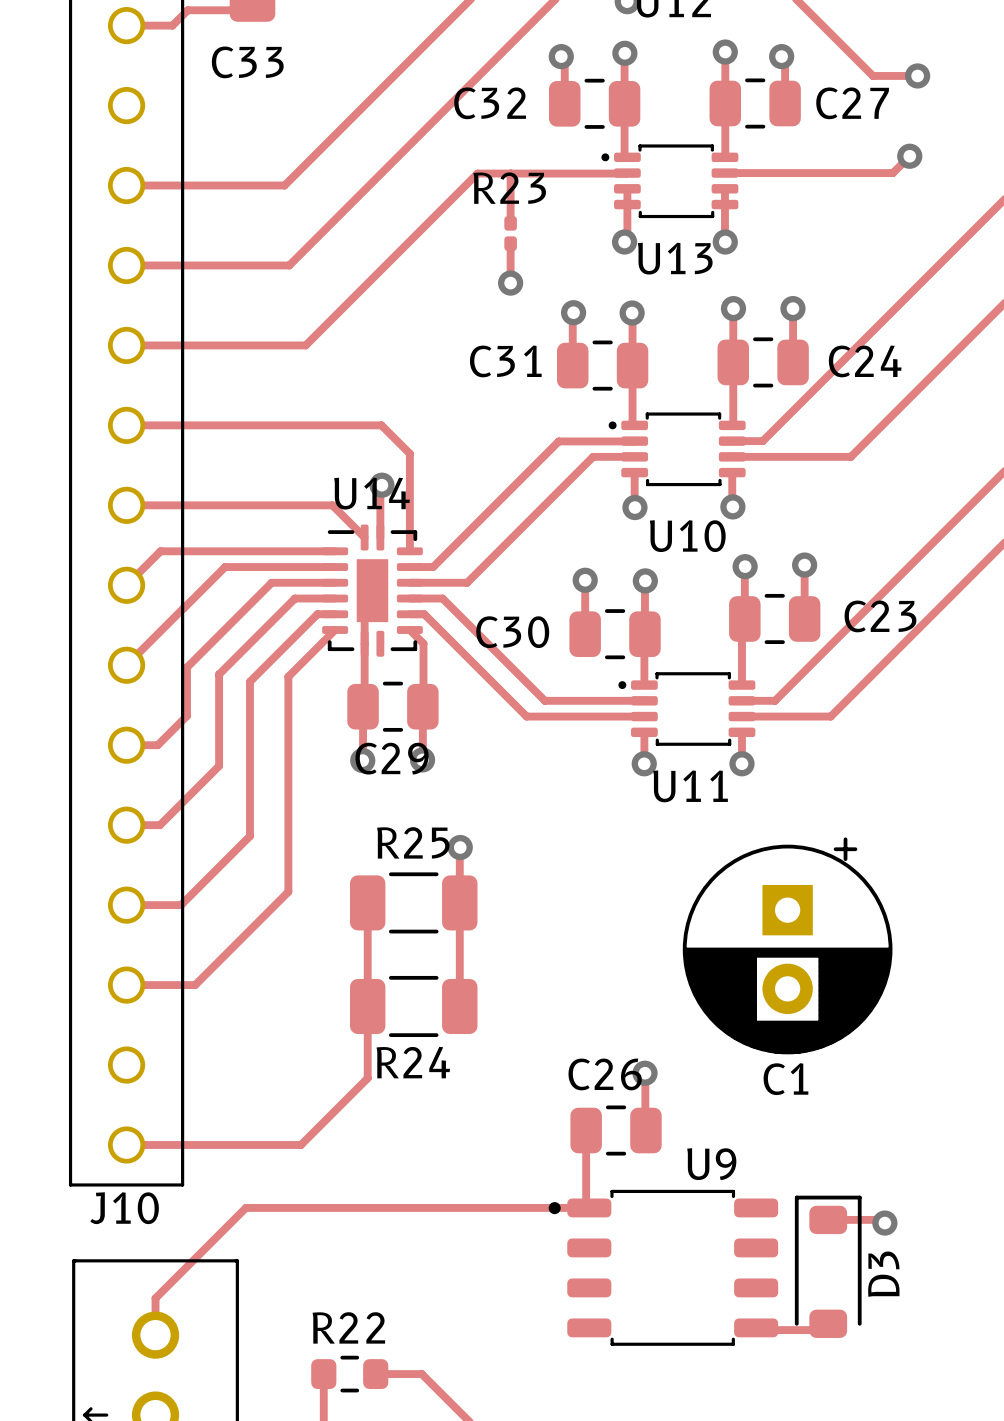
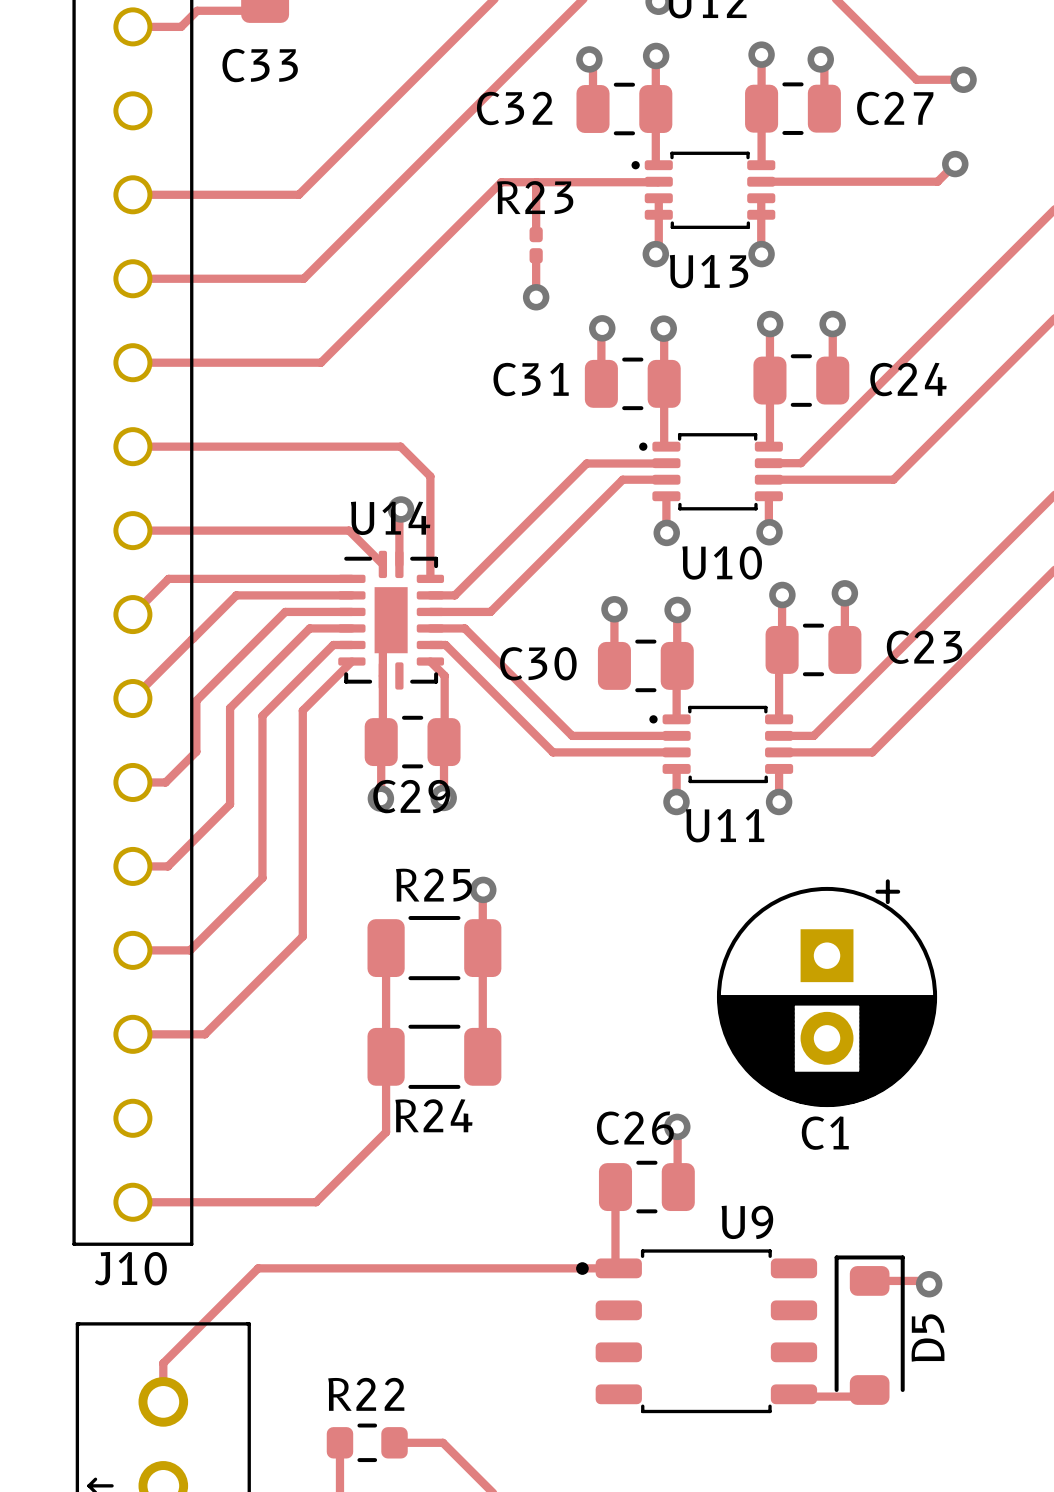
D3 name: D3 (883, 1274) -> D5 (928, 1338)

